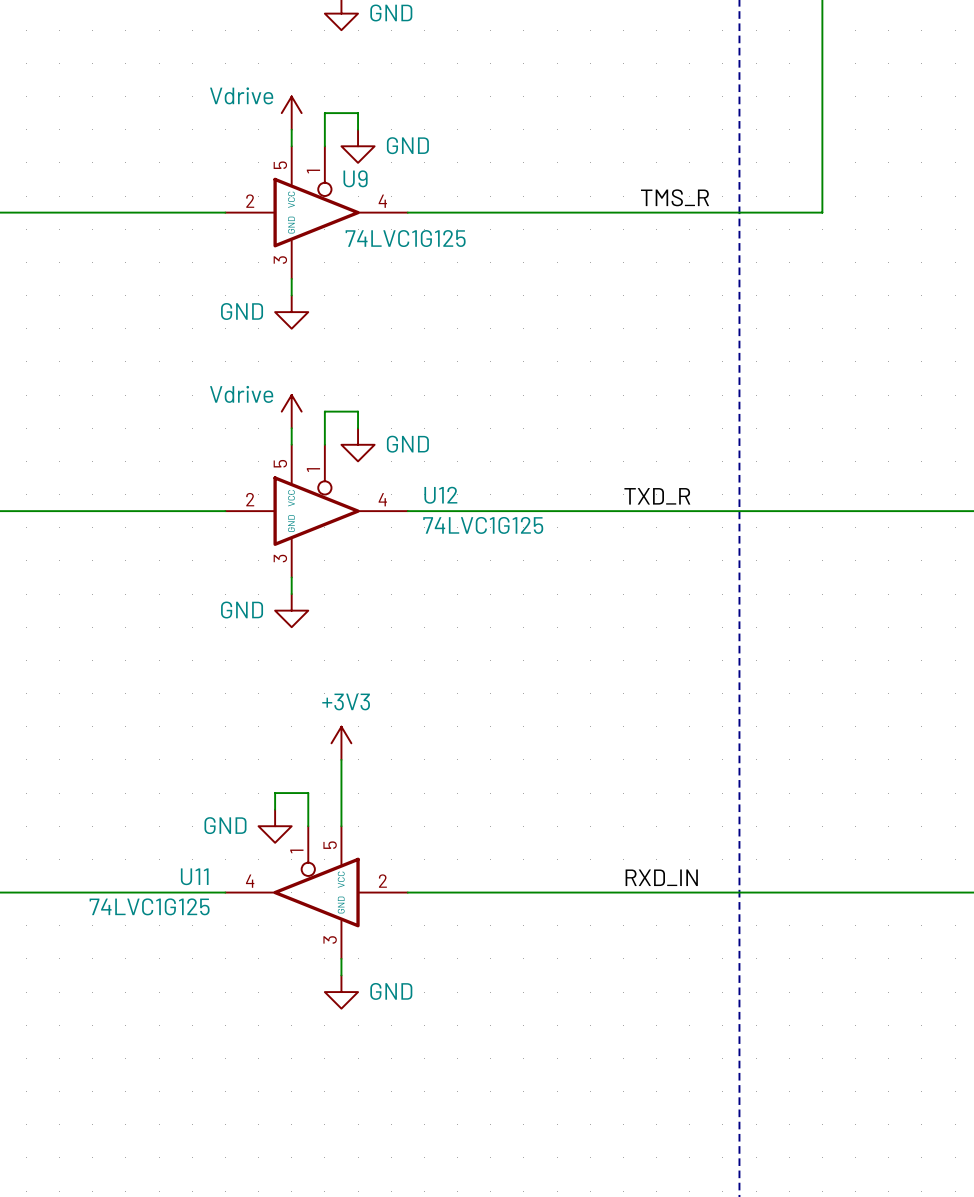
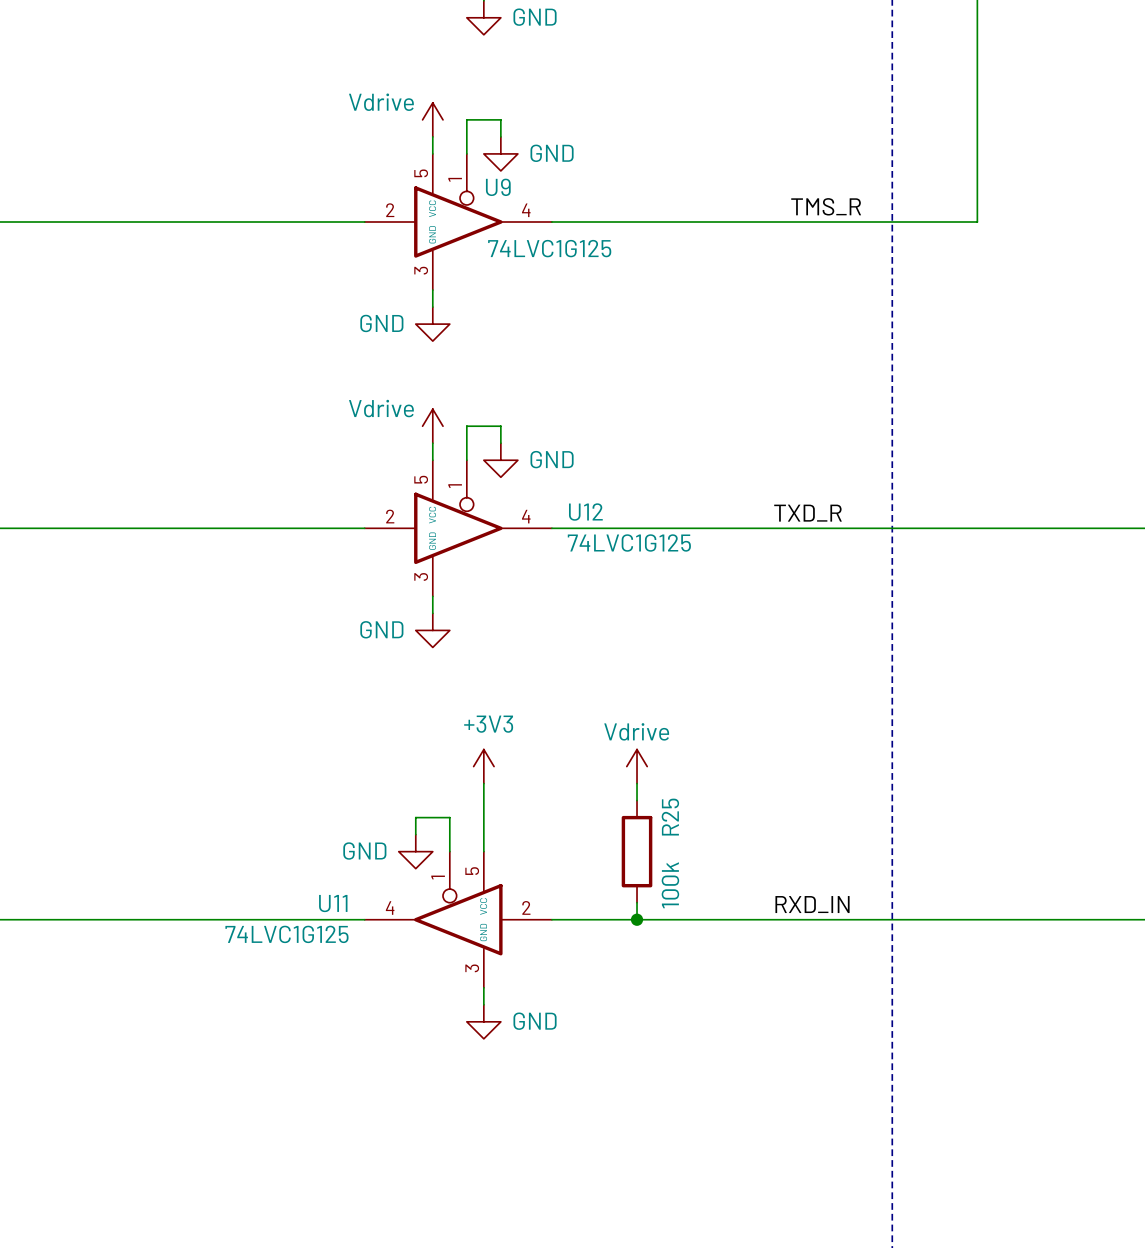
power symbol: none -> Vdrive (637, 766)
wire: none -> (637, 783) (637, 800)
R25: none -> 100k (637, 851)
wire: none -> (637, 902) (637, 919)
junction: none -> (637, 919)

